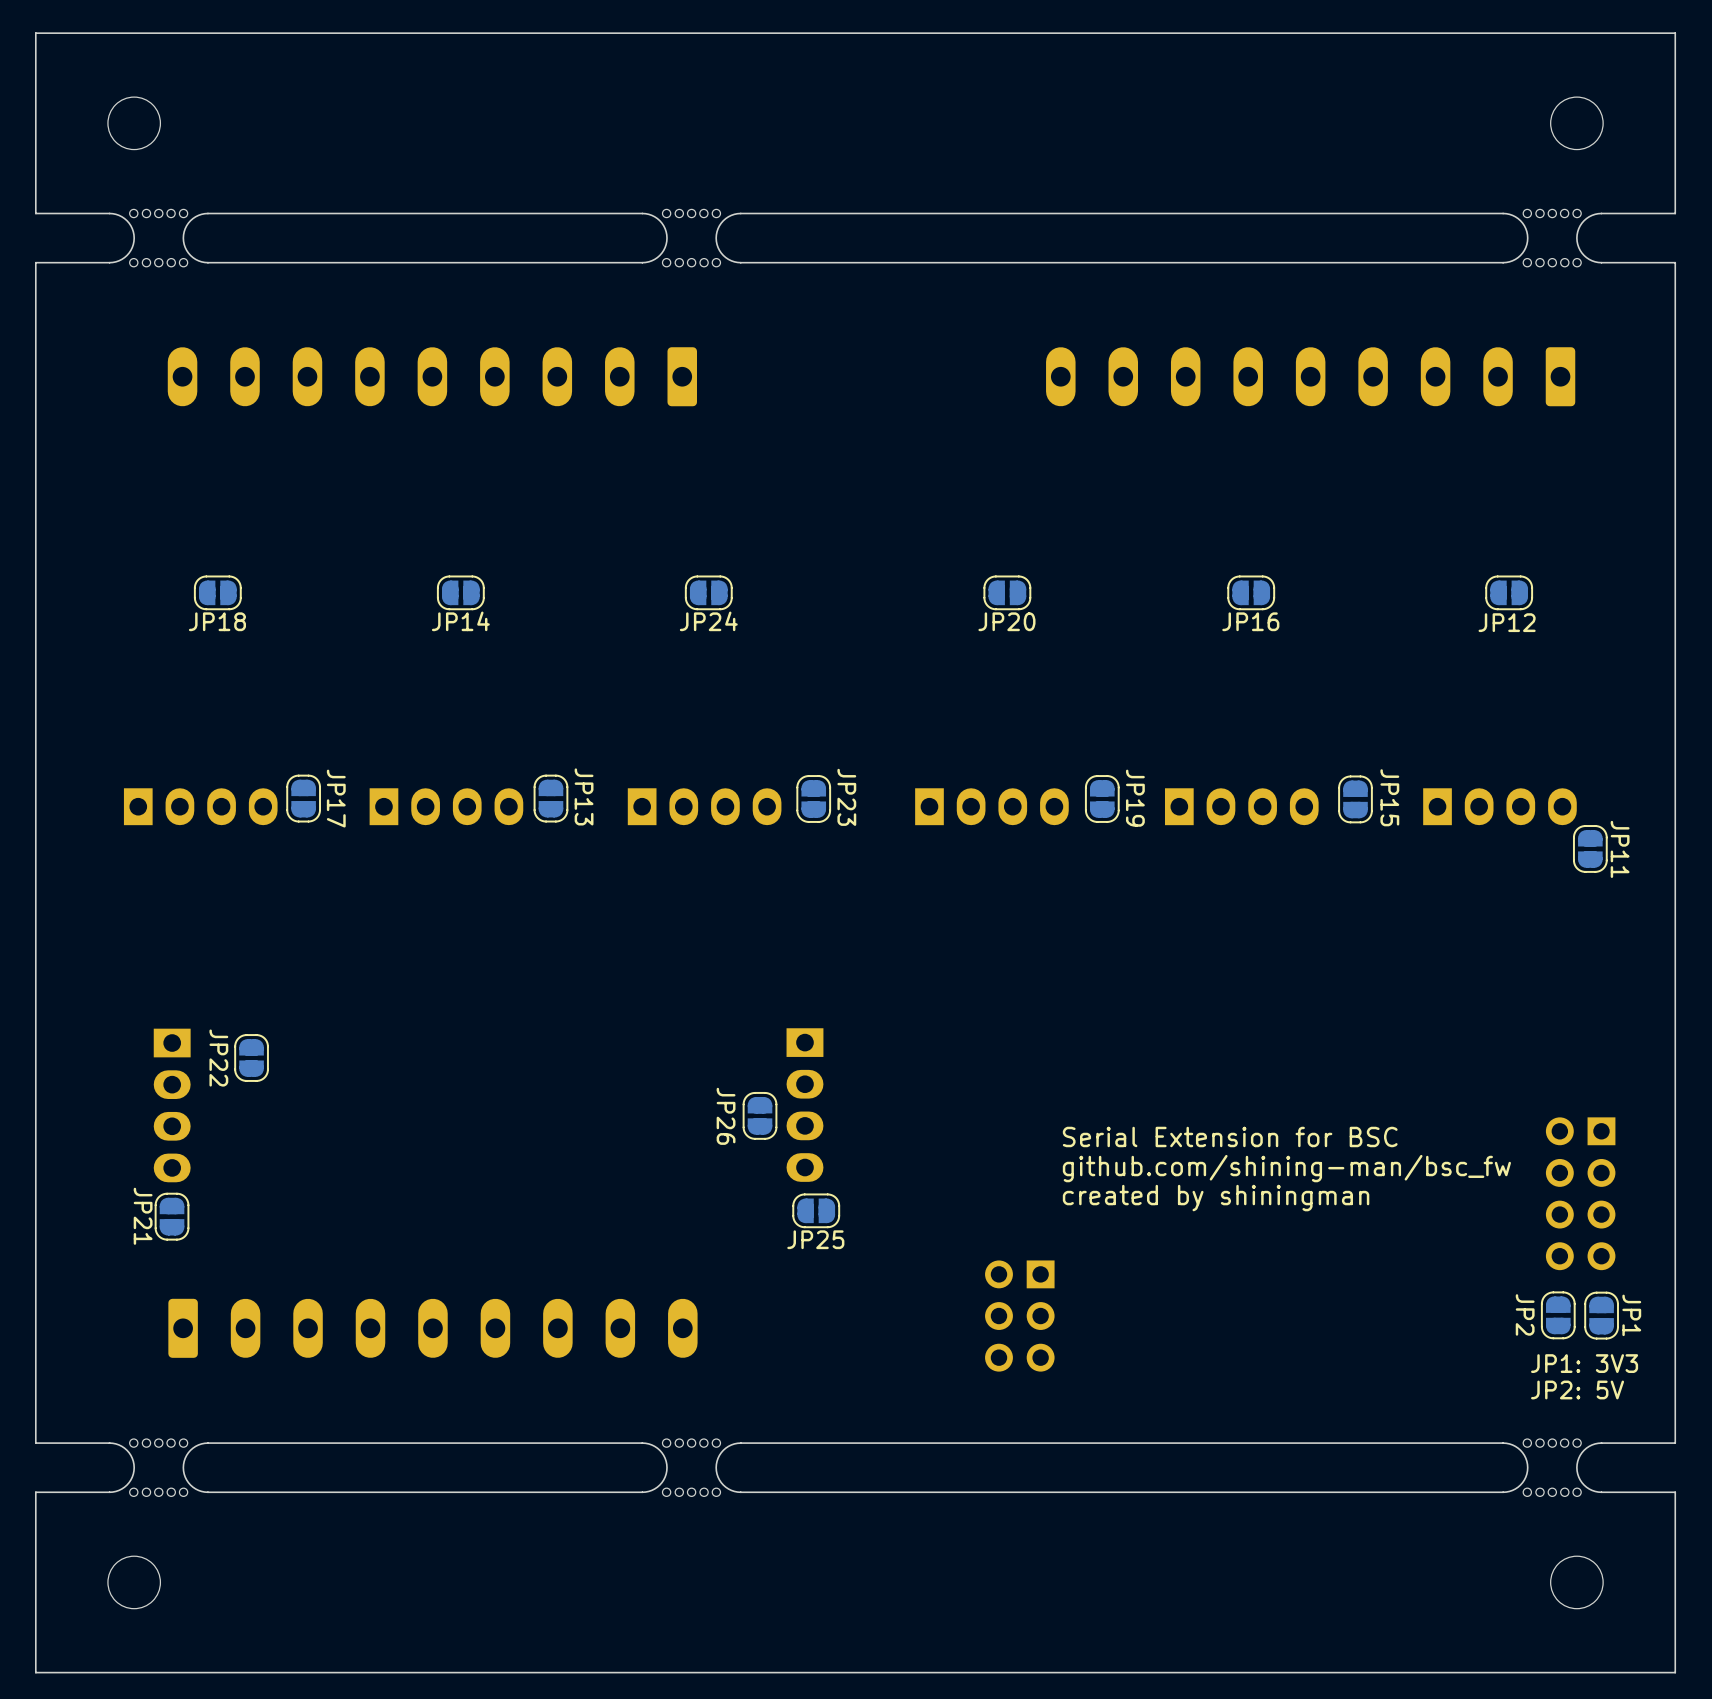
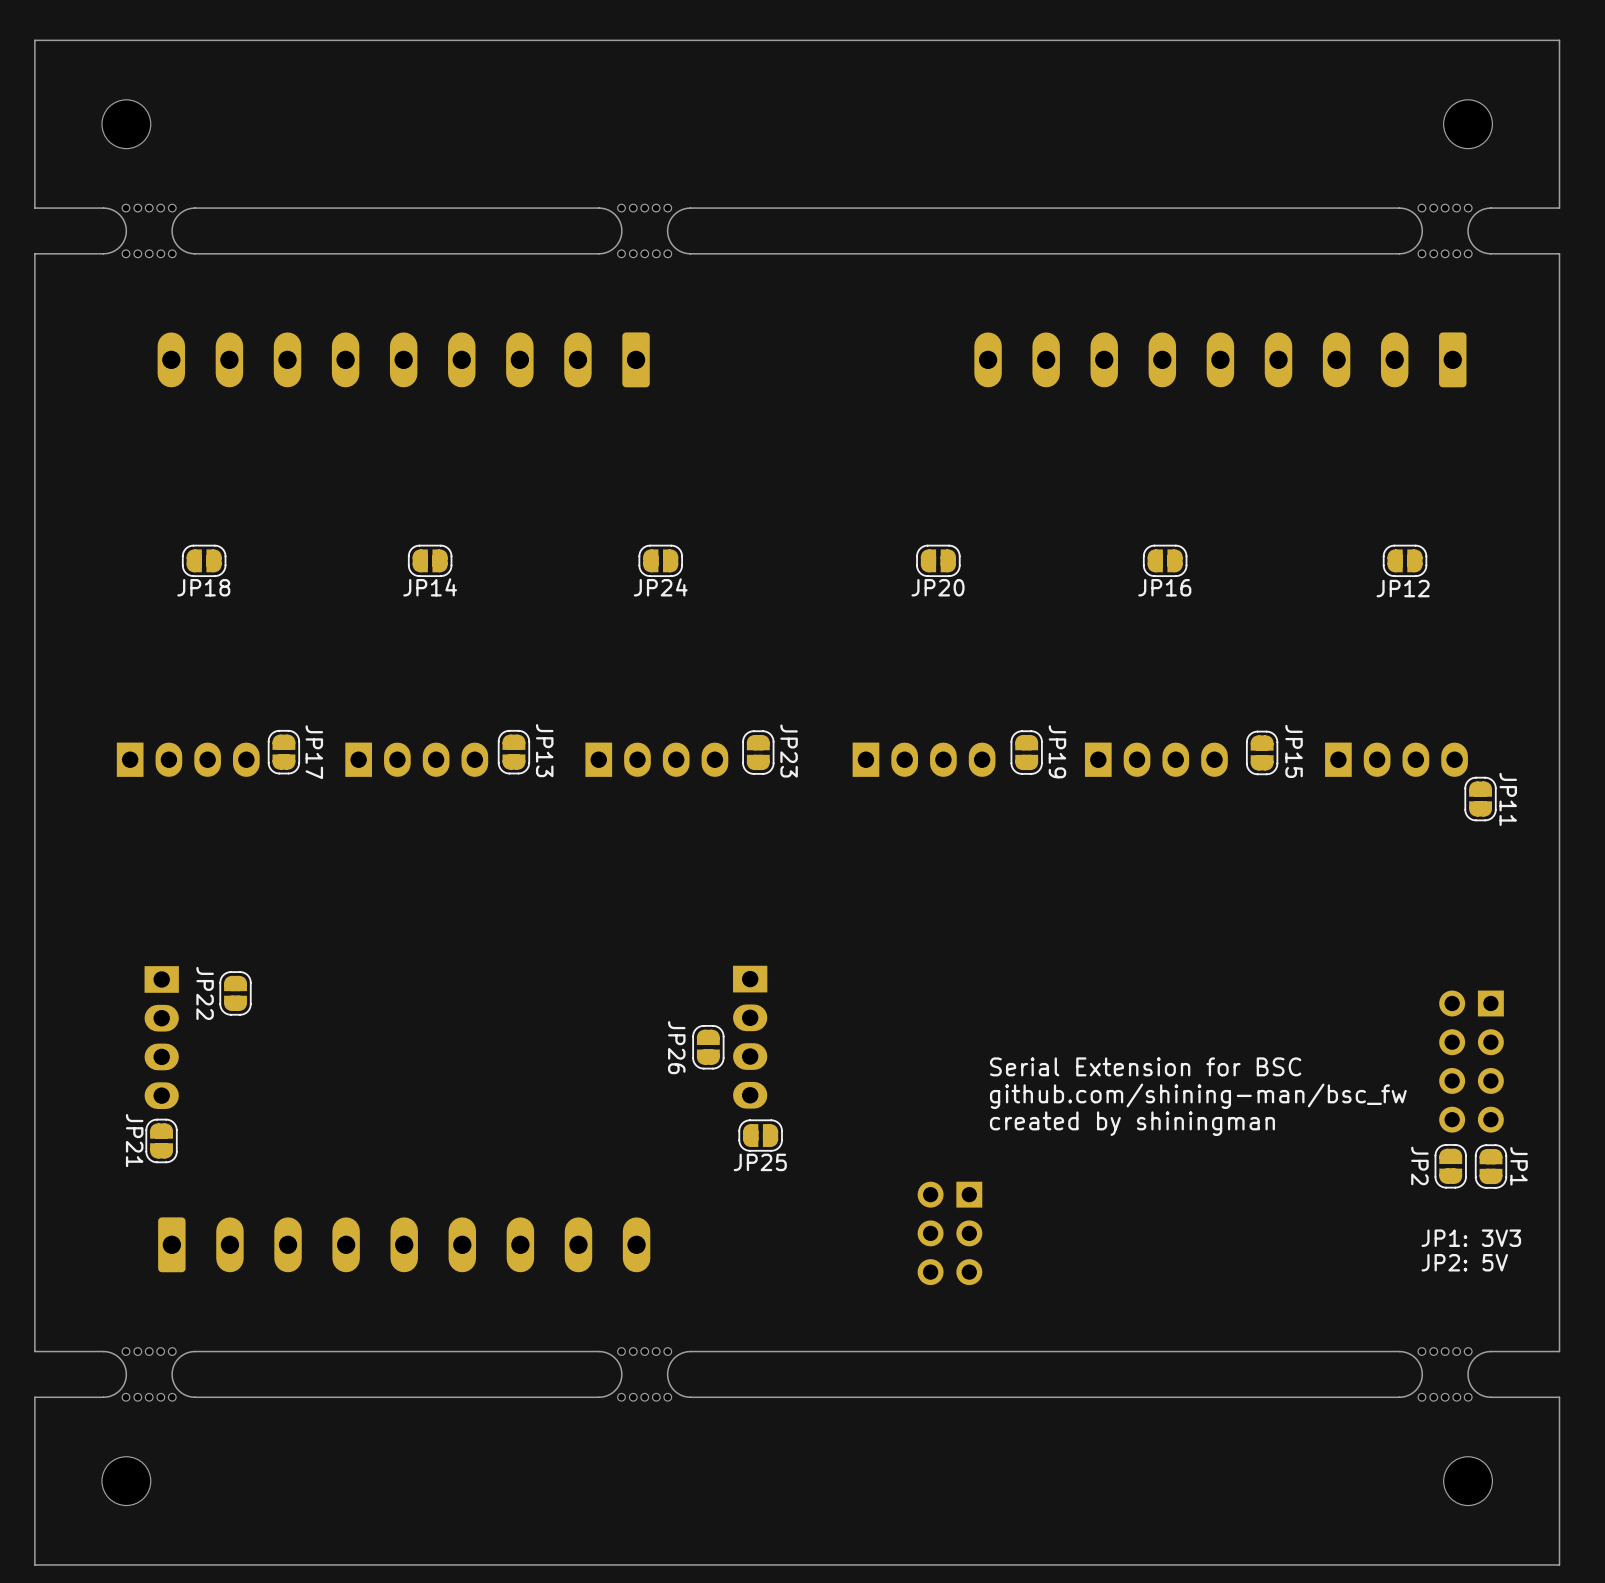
part position: (1580, 1193) -> (1471, 1061)
JP2 position: (1558, 1315) -> (1450, 1166)
JP1 position: (1601, 1315) -> (1490, 1166)
text position: JP1: 3V3 (1584, 1363) -> JP1: 3V3 (1471, 1238)
text position: JP2: 5V (1577, 1389) -> JP2: 5V (1464, 1262)

